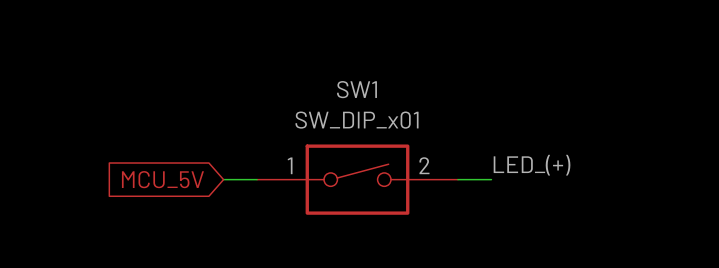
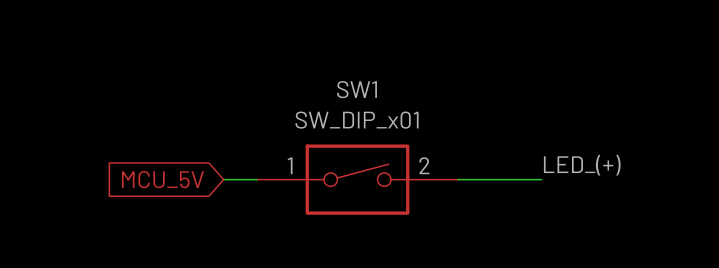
label position: LED_(+) (532, 165) -> LED_(+) (582, 165)
wire: none -> (491, 179) (541, 179)

